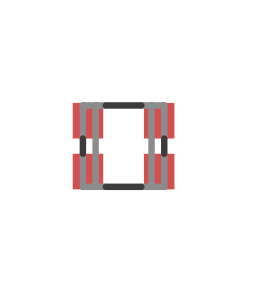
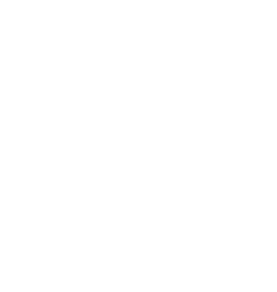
part: (123, 146) -> none

